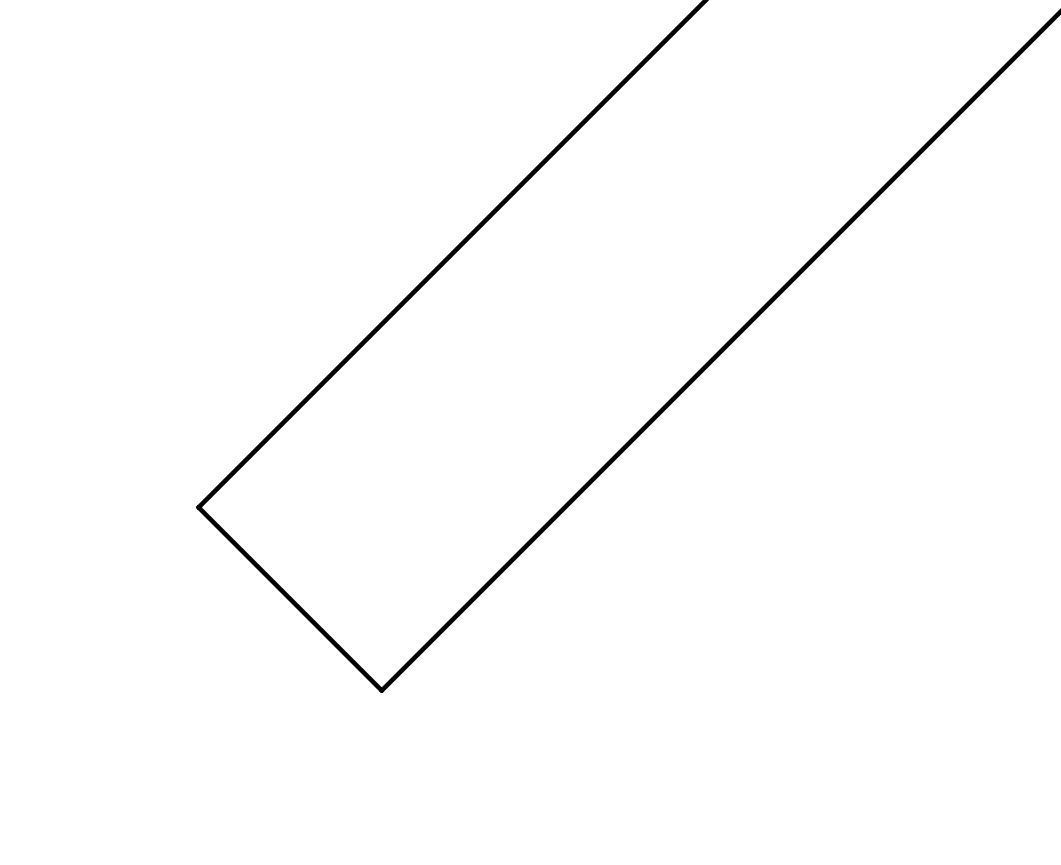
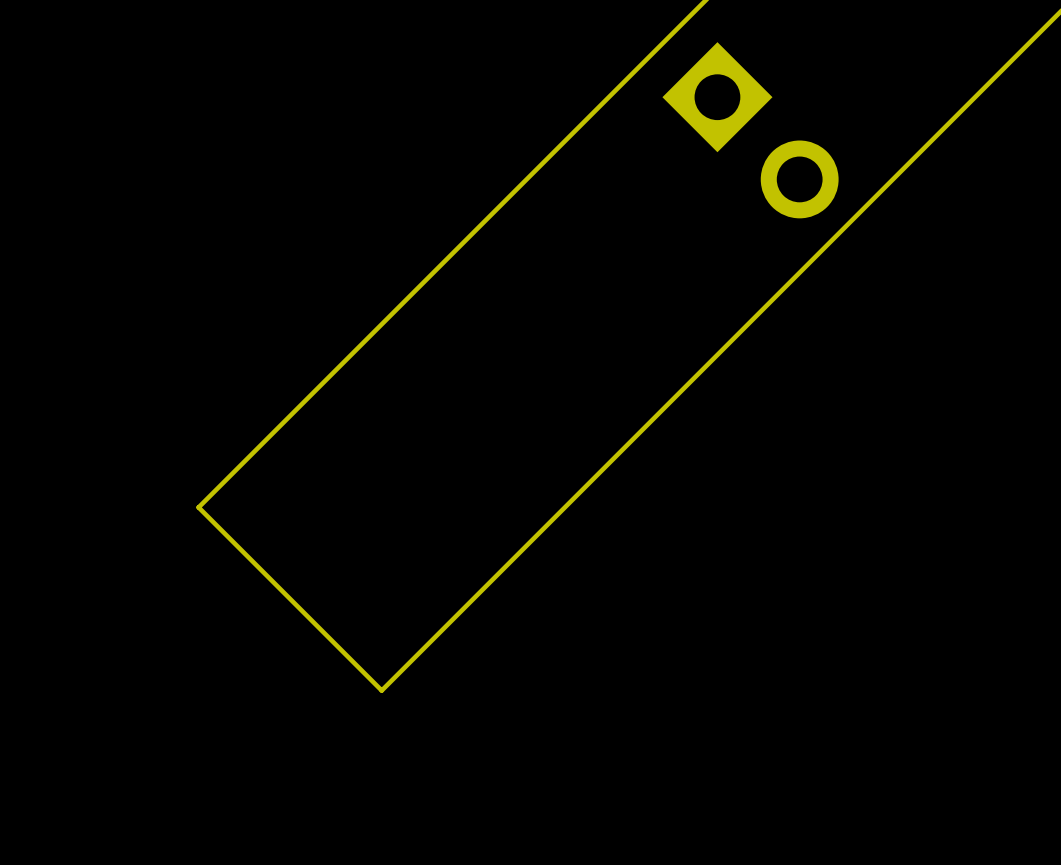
part: none -> (750, 130)

